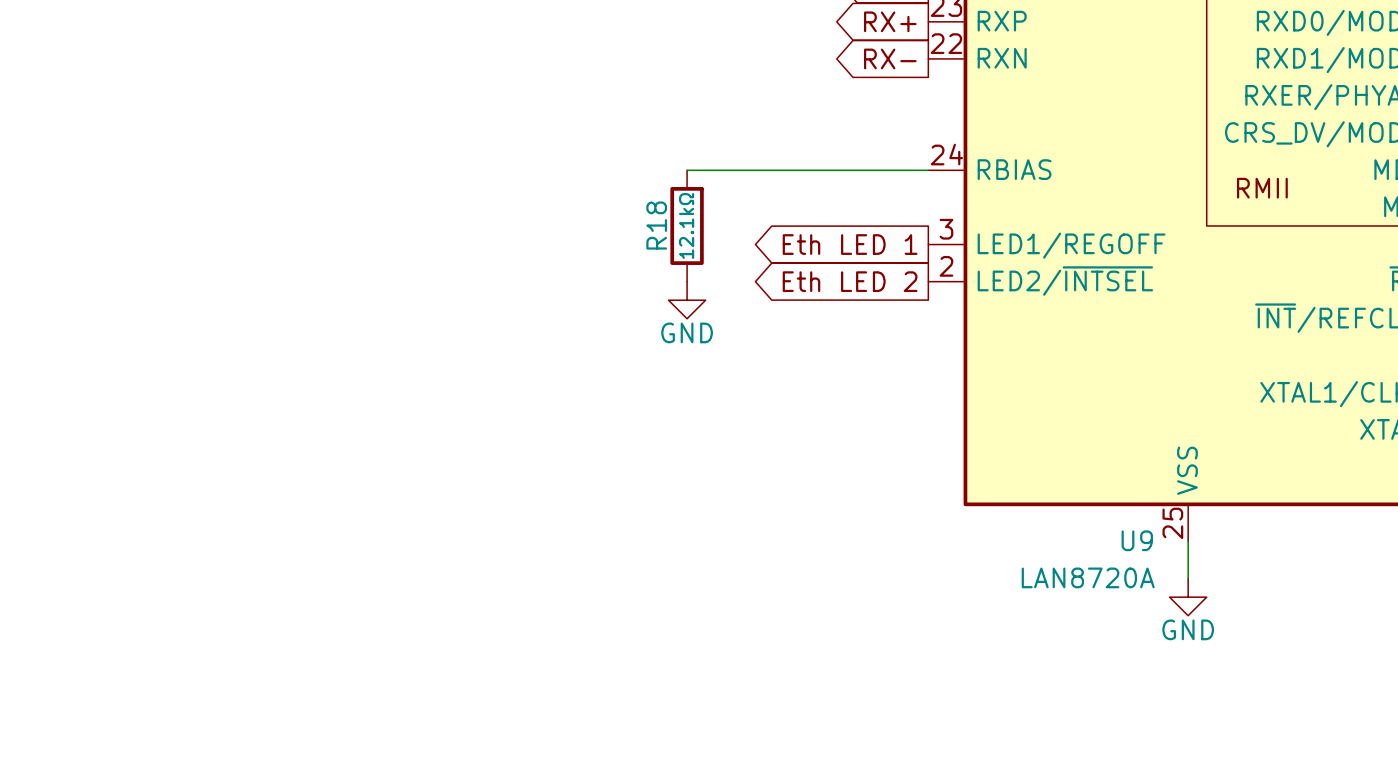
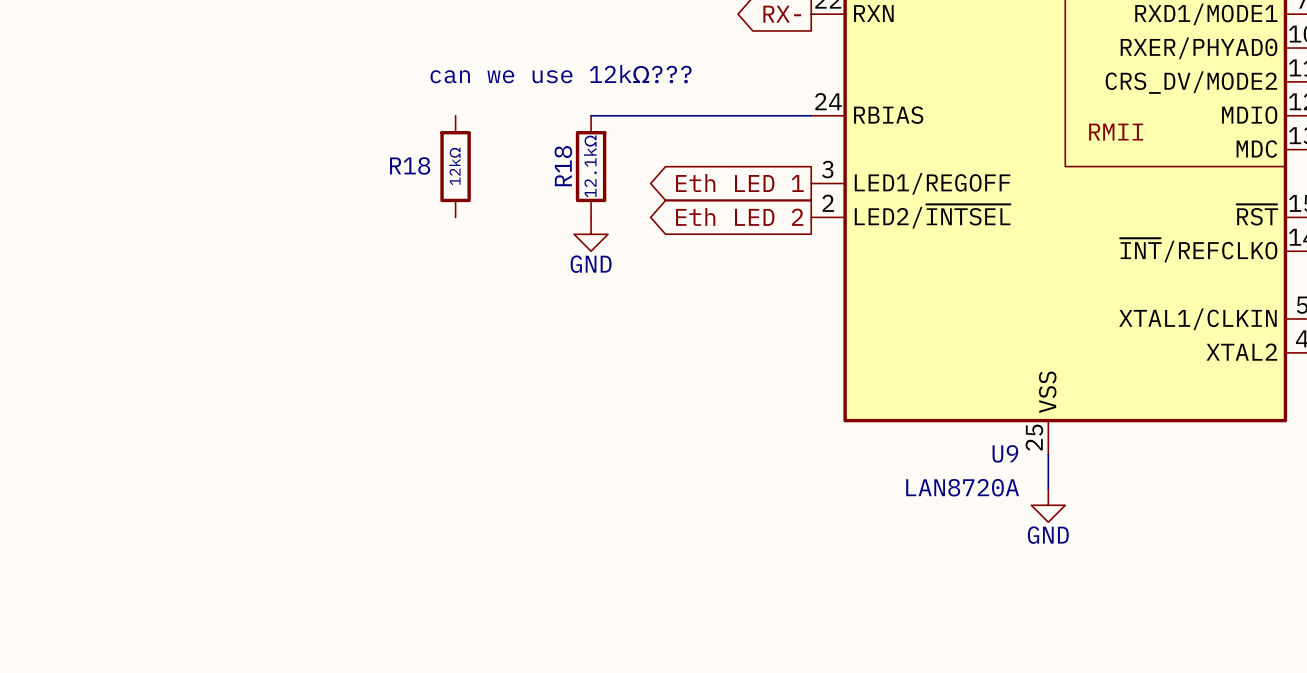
text: none -> can we use 12kΩ??? (561, 74)
R18: none -> 12kΩ (455, 166)

